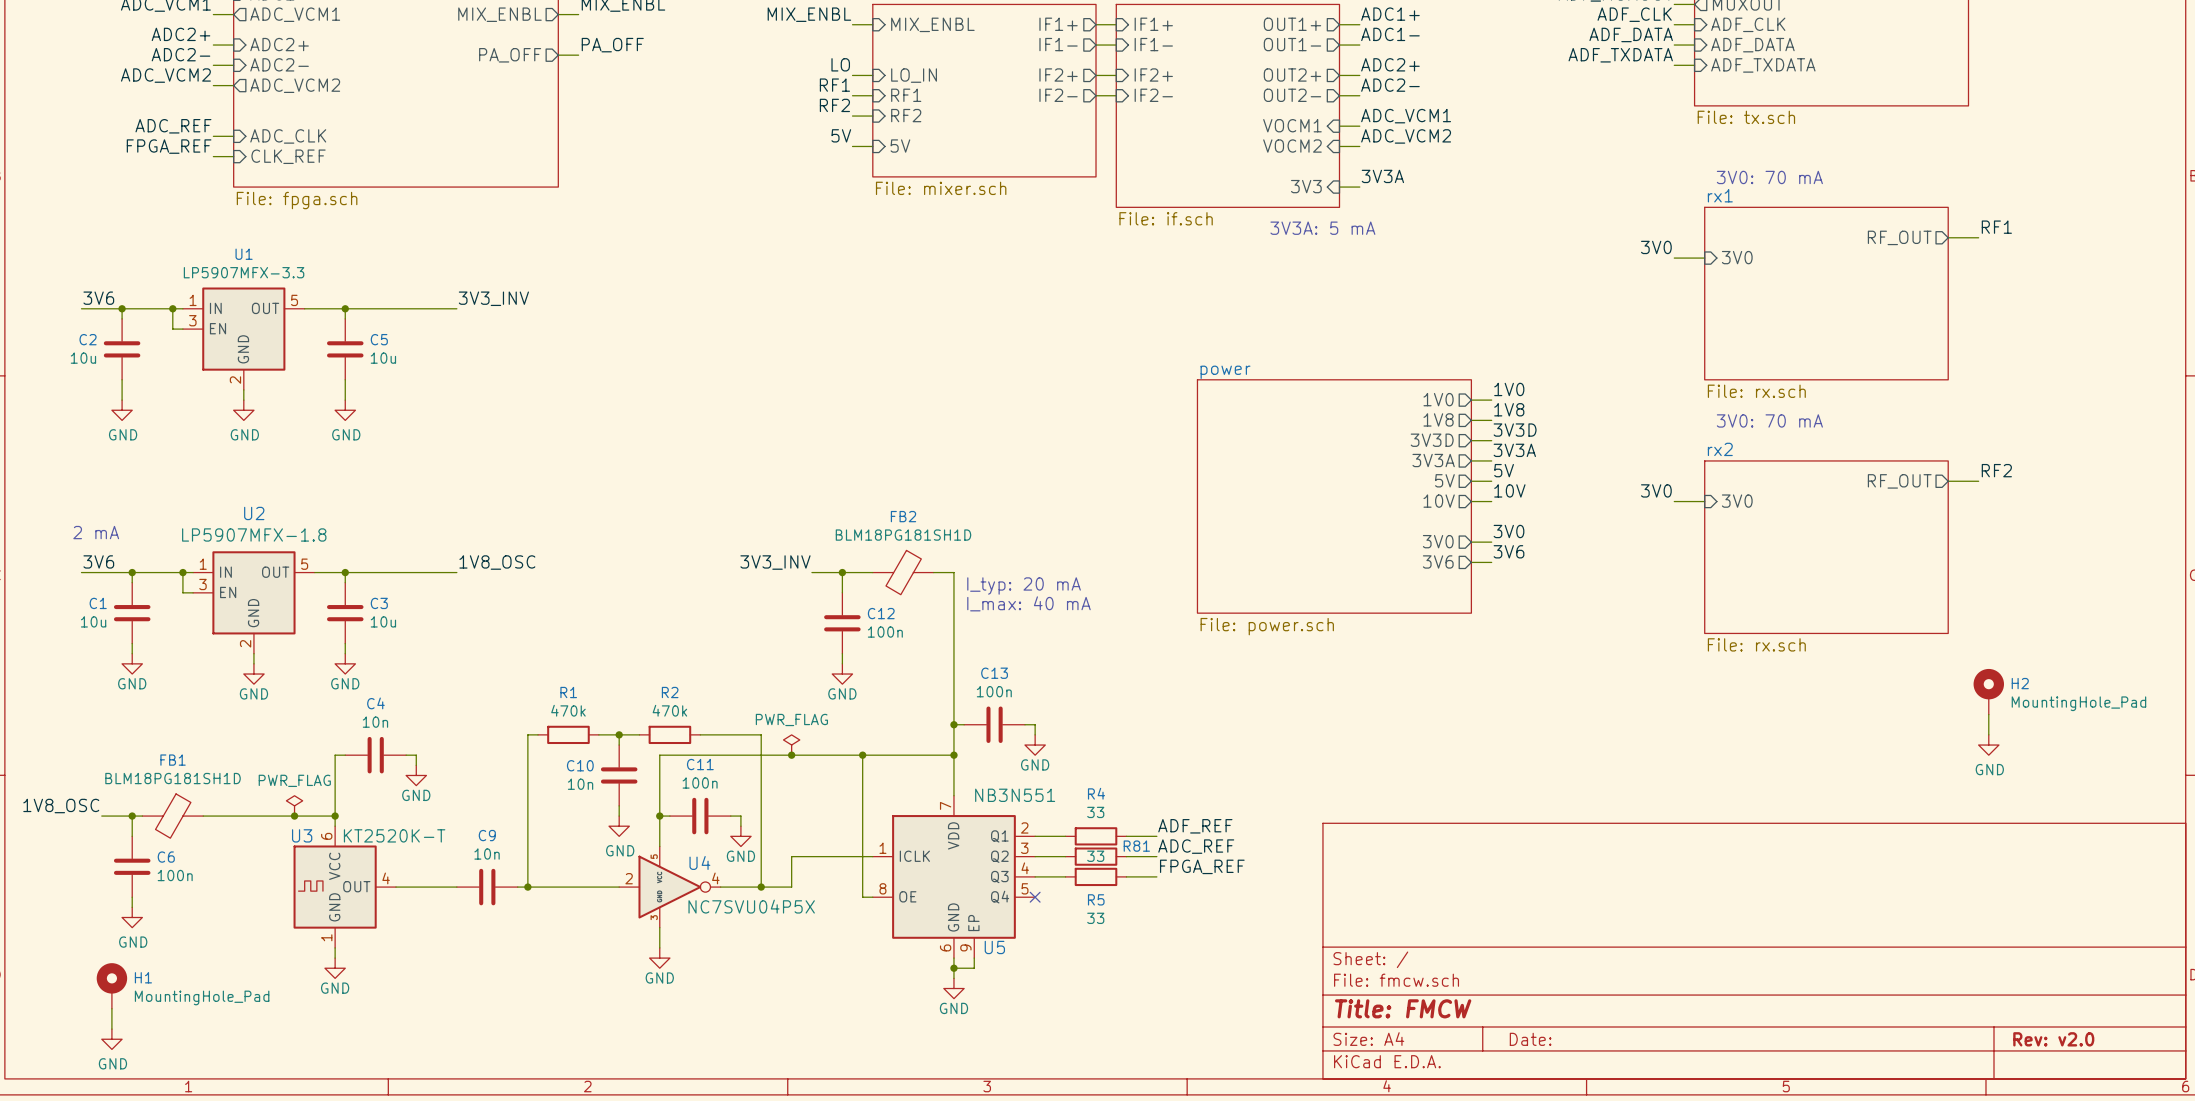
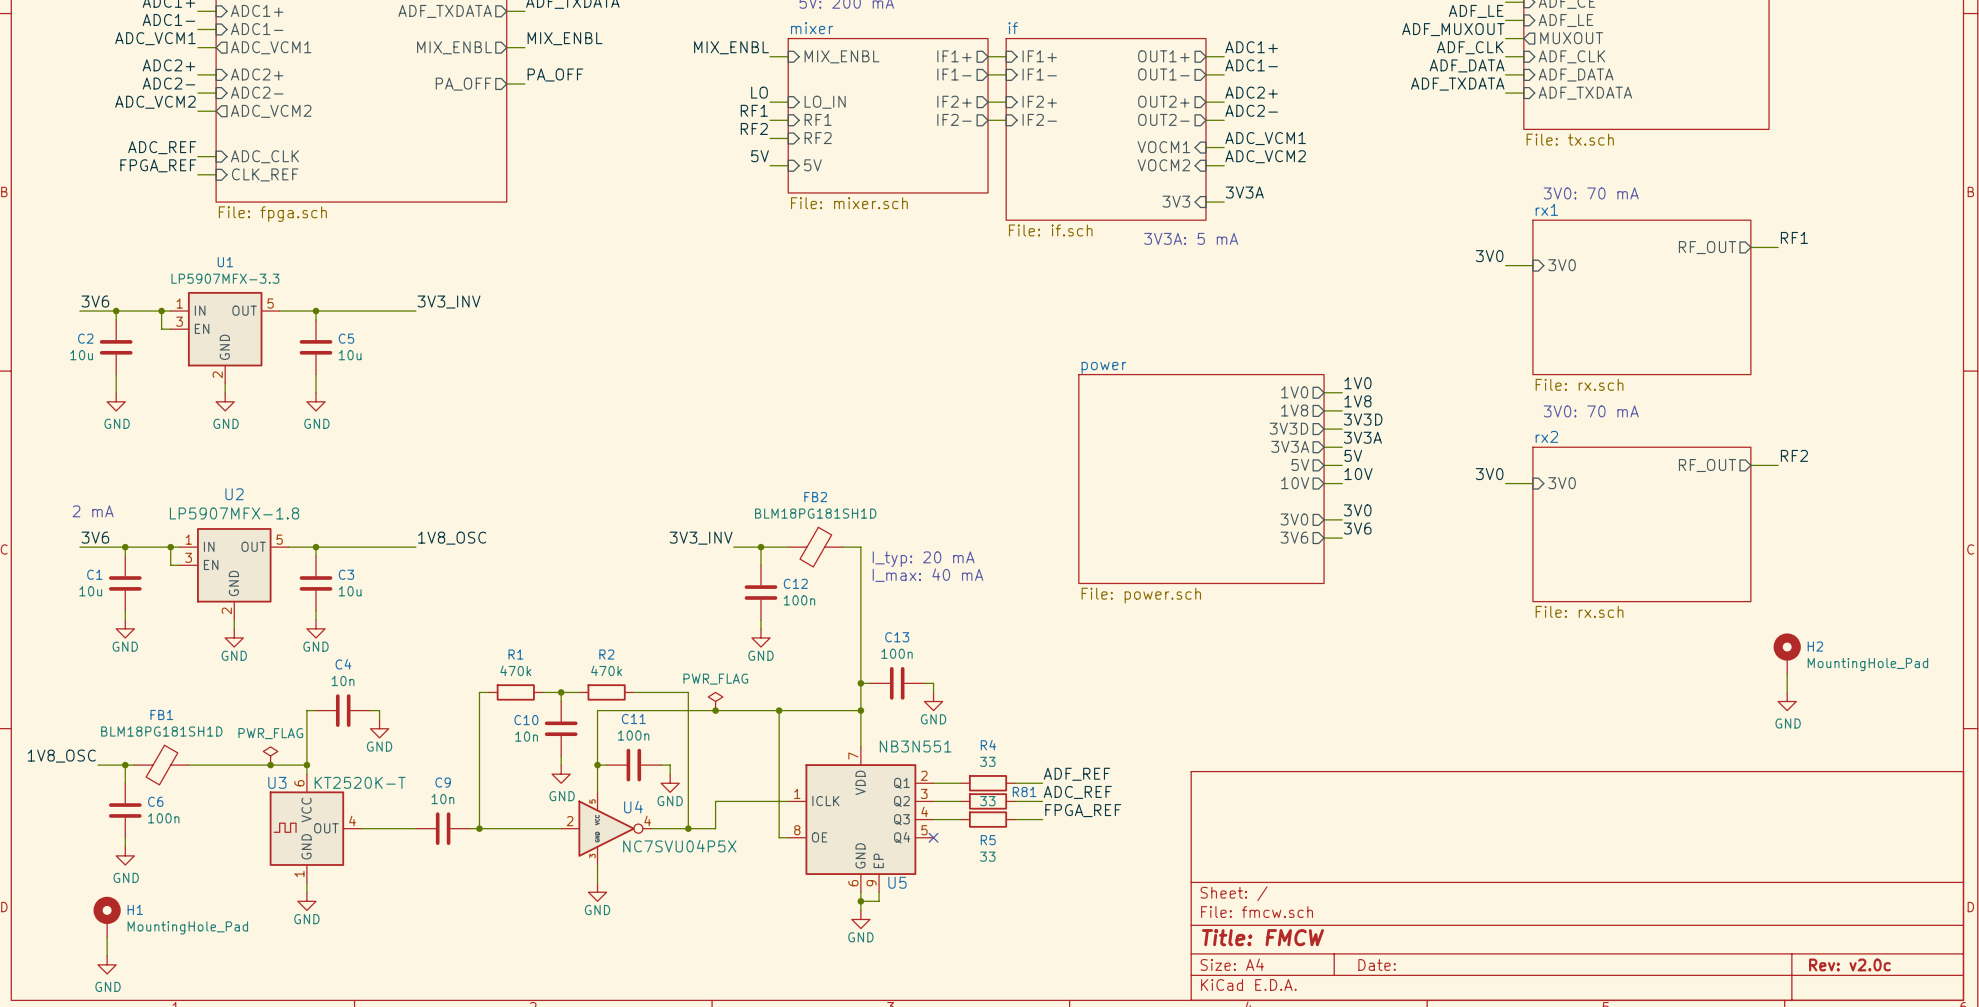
title block: Rev: v2.0 (2053, 1039) -> Rev: v2.0c (1849, 964)

